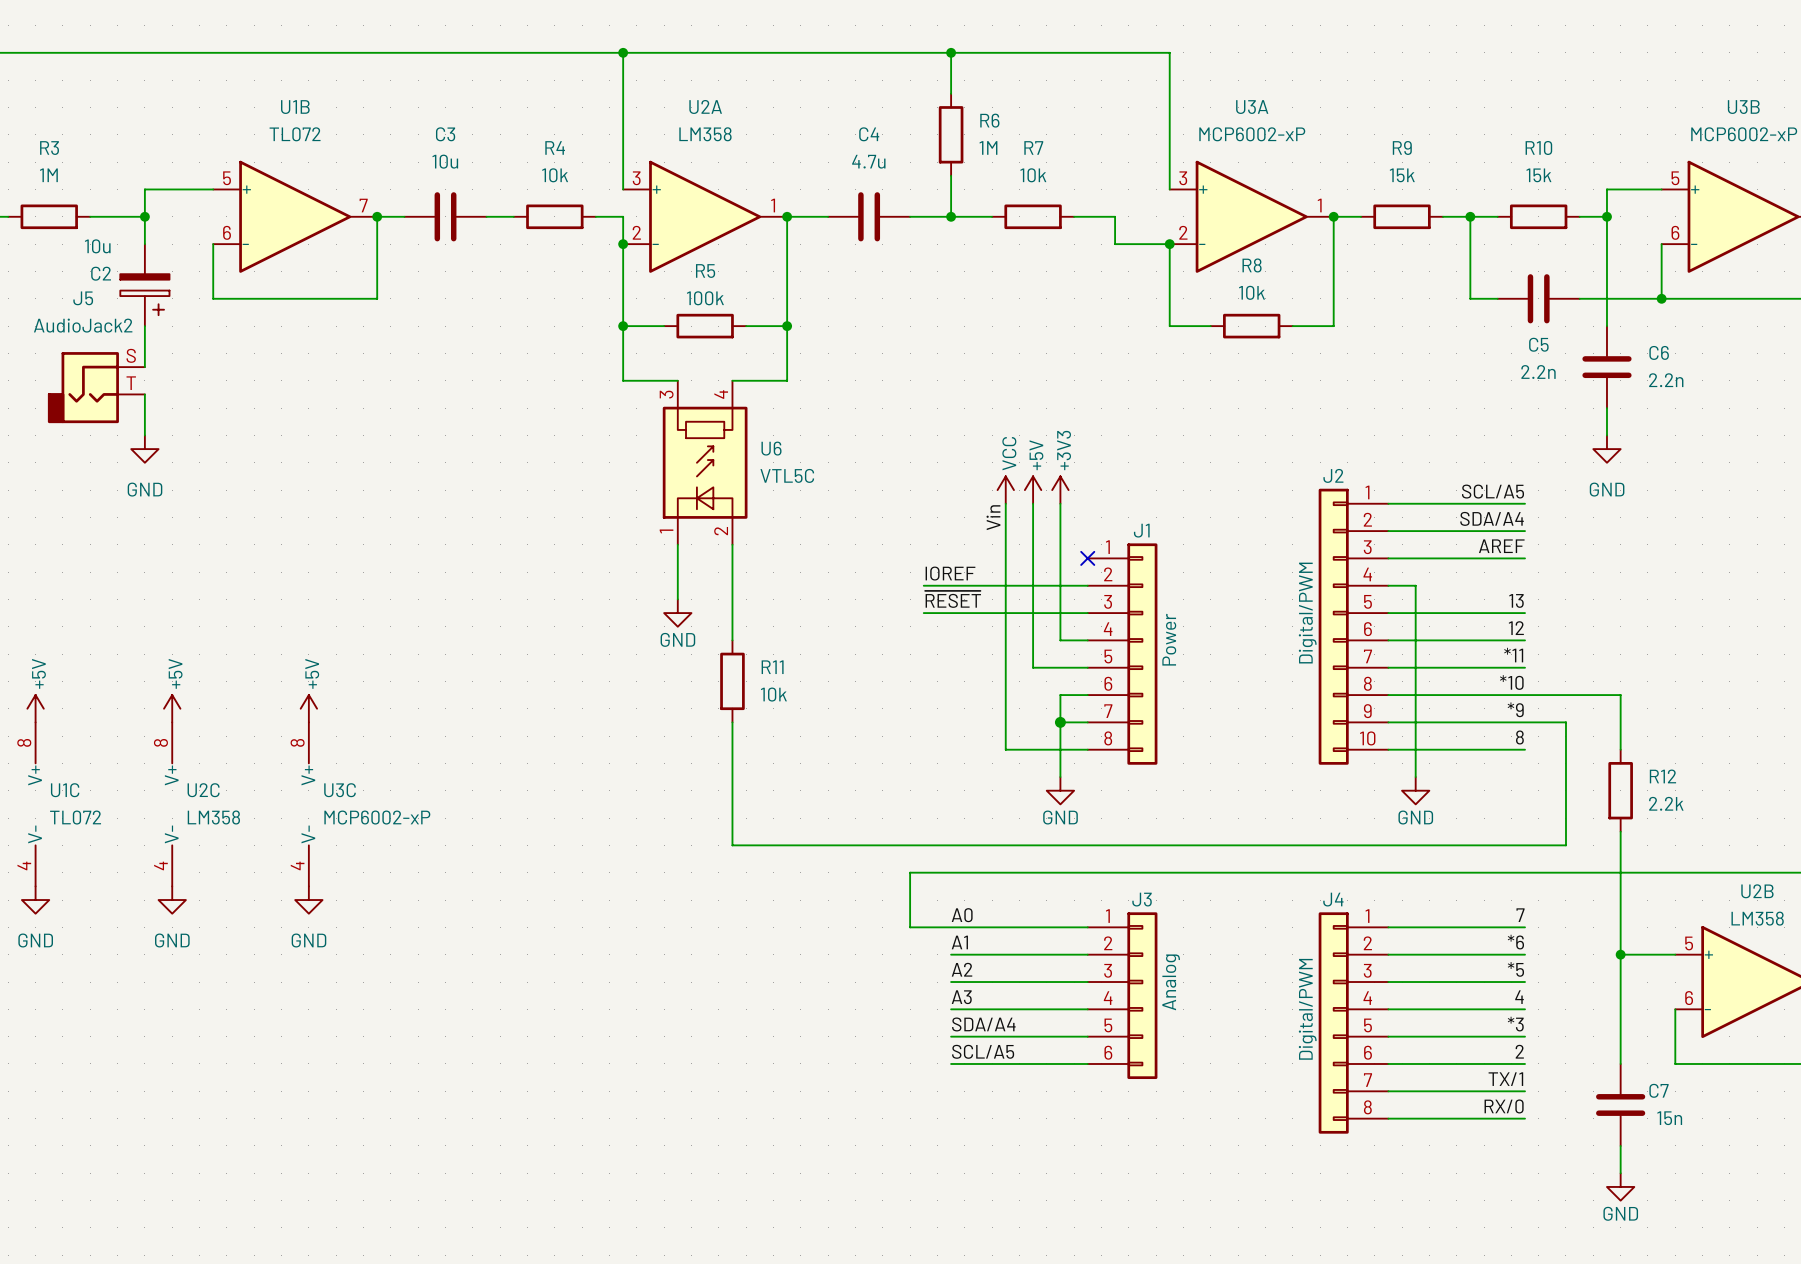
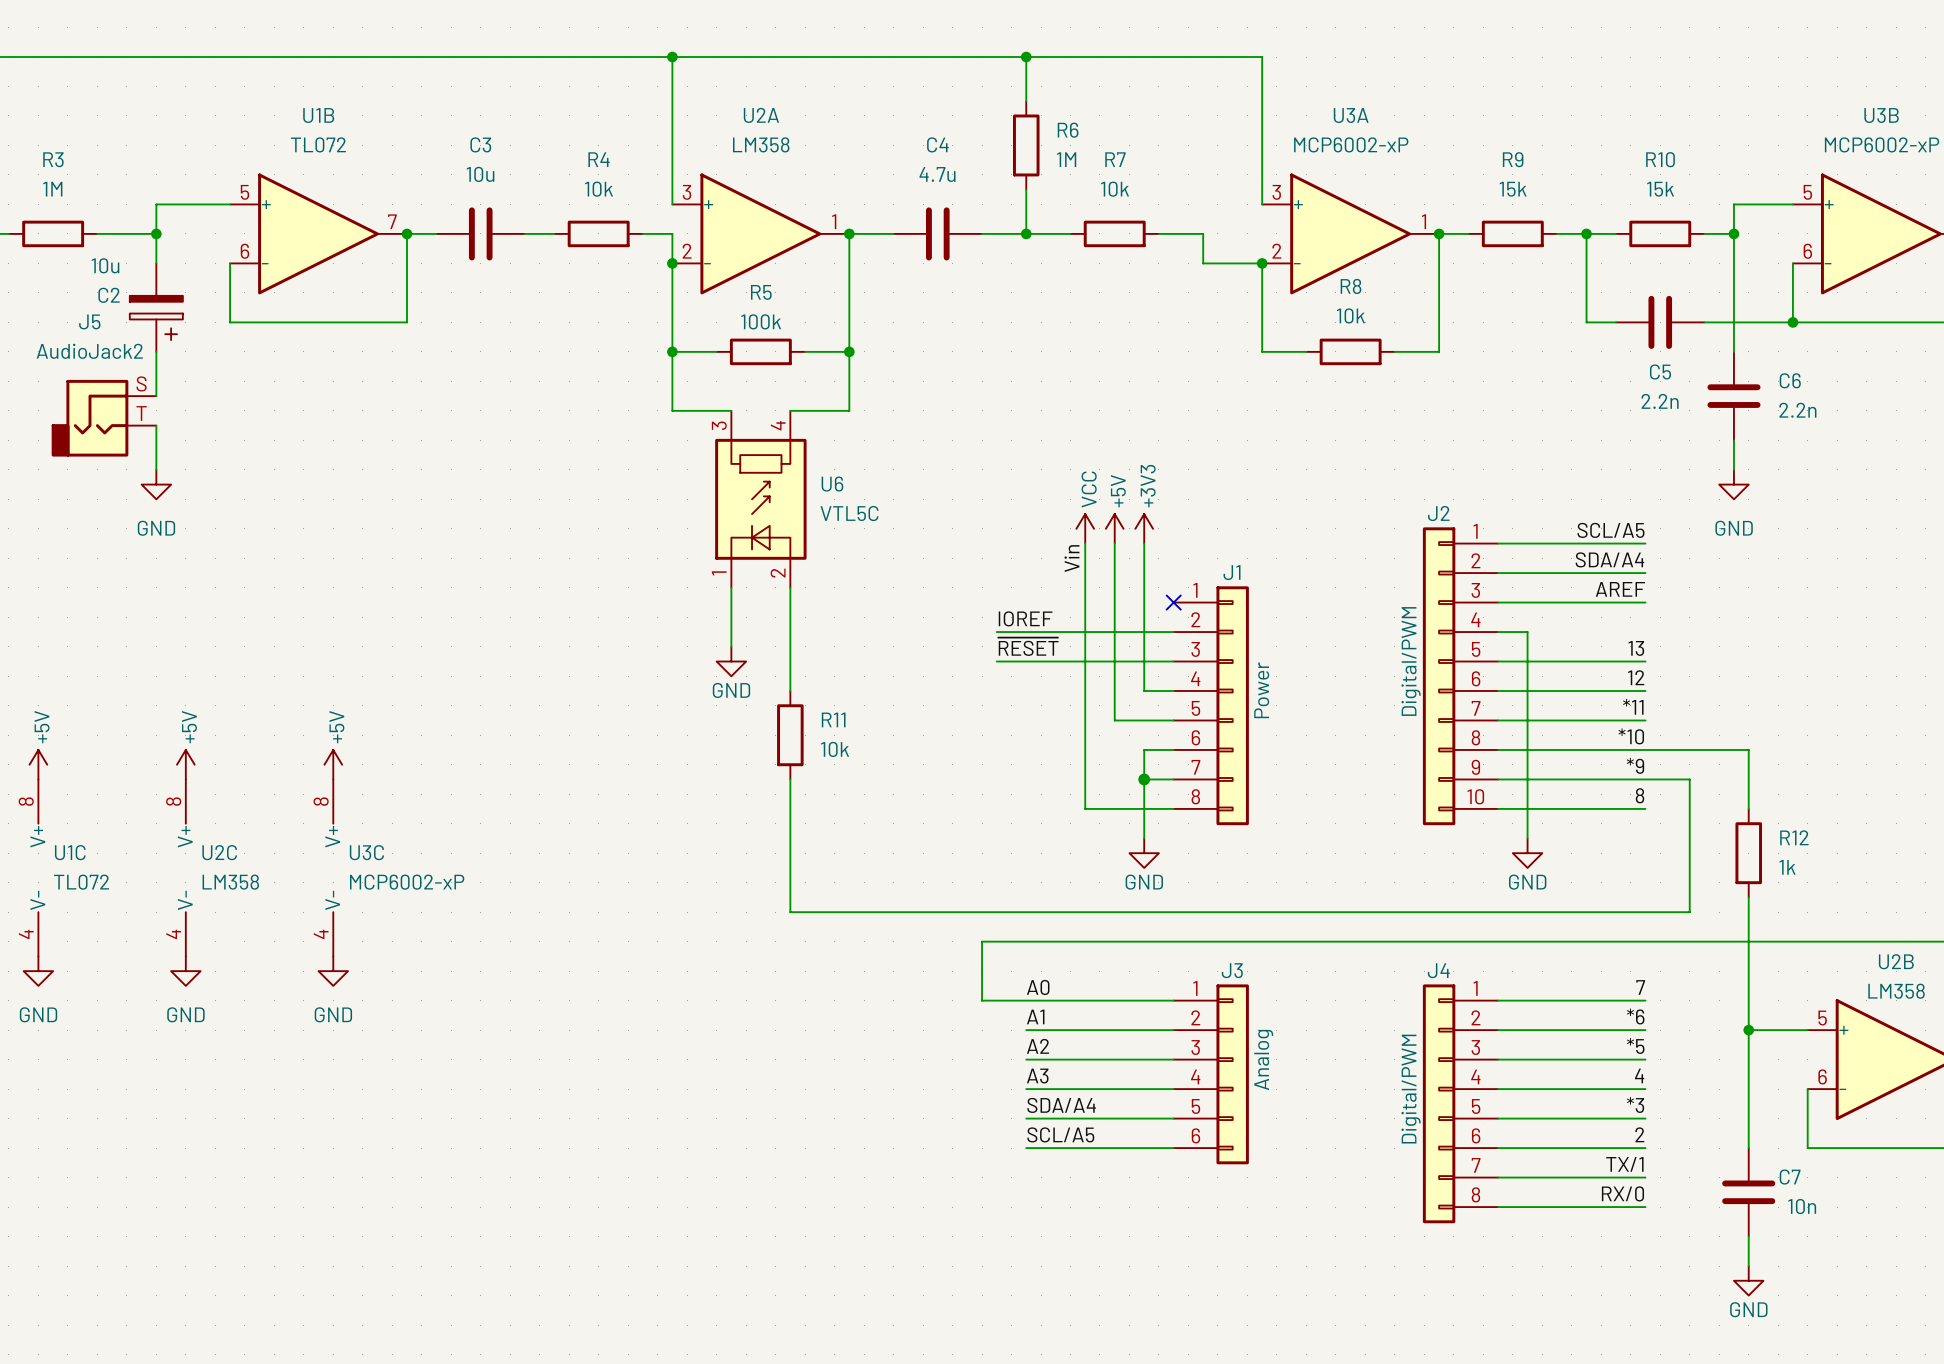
R12 value: 2.2k (1666, 803) -> 1k (1787, 867)
C7 value: 15n (1669, 1118) -> 10n (1802, 1206)

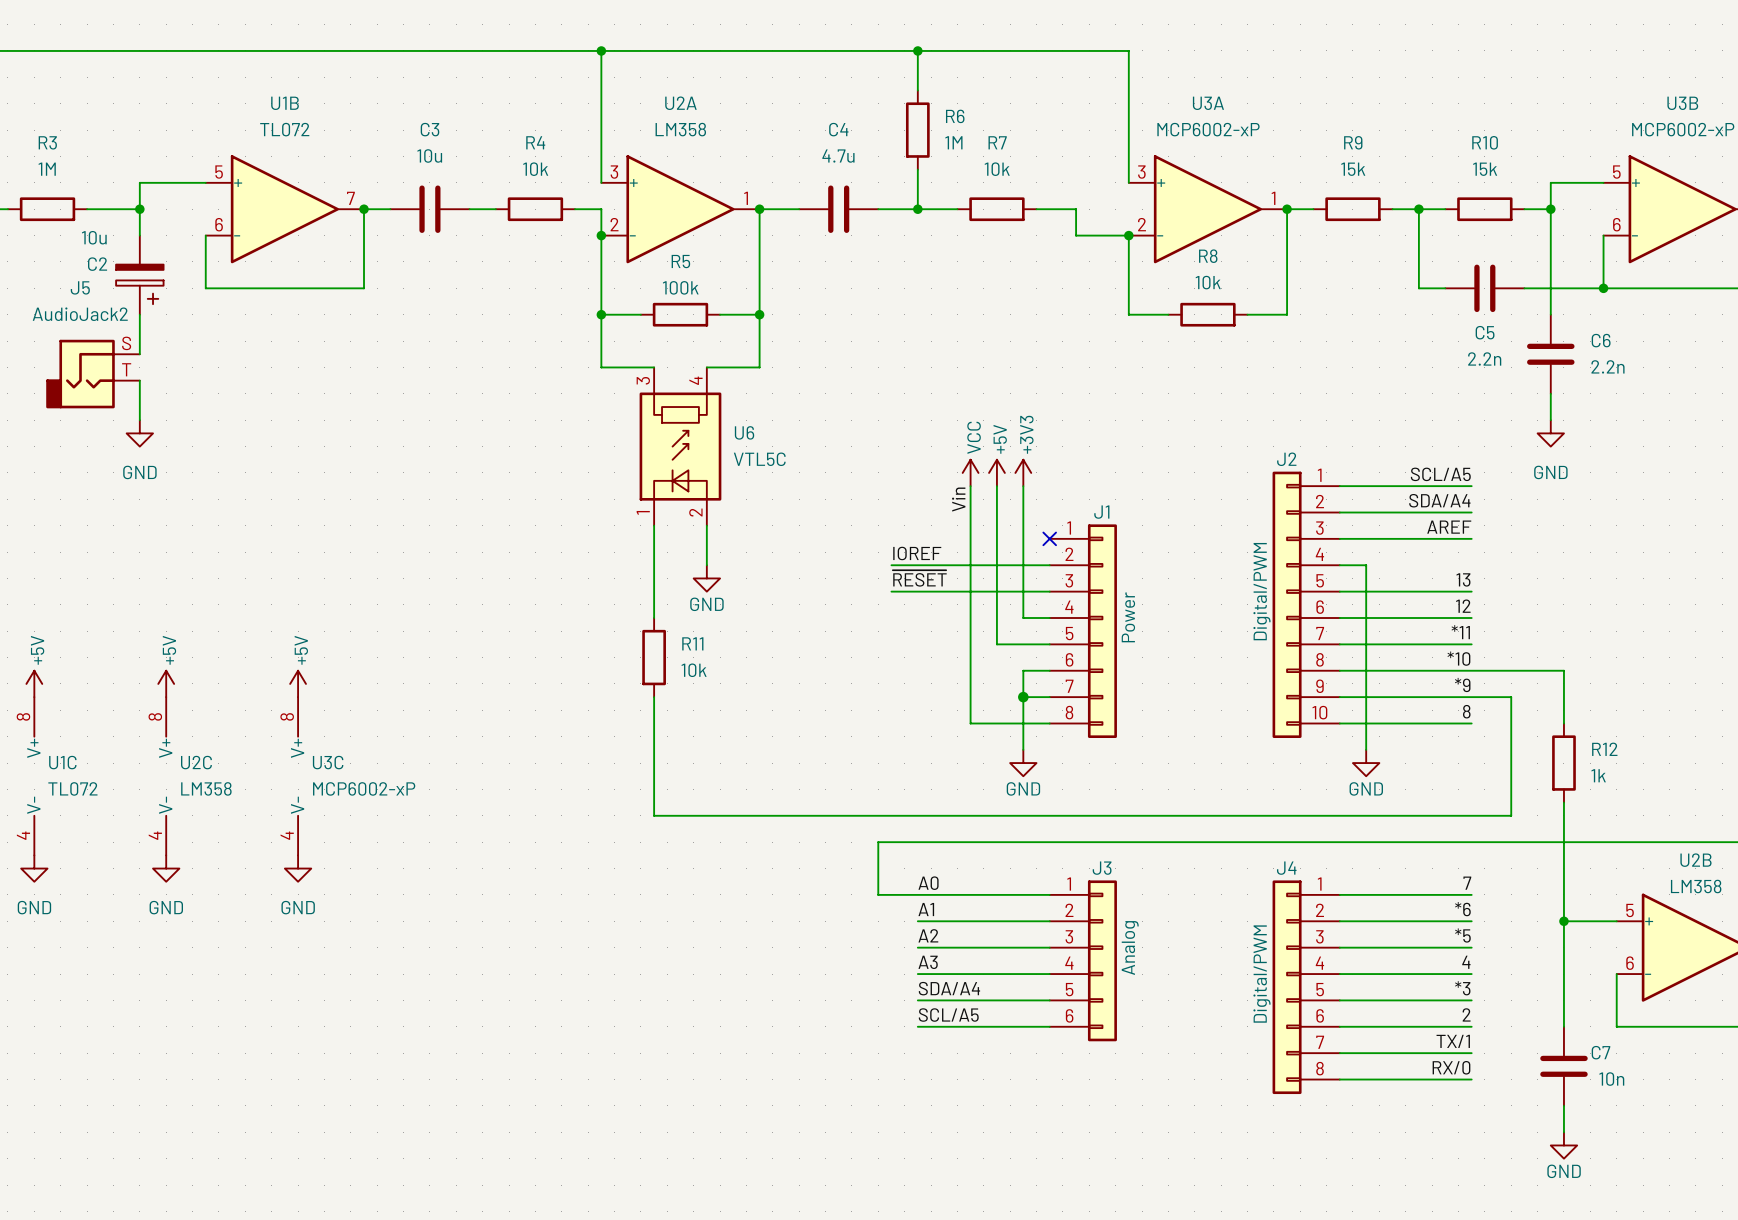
wire: (790, 632) (790, 691) -> none
wire: none -> (654, 578) (654, 618)
power symbol position: GND (731, 661) -> GND (706, 578)
R11 position: (790, 735) -> (654, 657)
wire: (790, 779) (790, 912) -> (654, 697) (654, 815) (706, 815)

